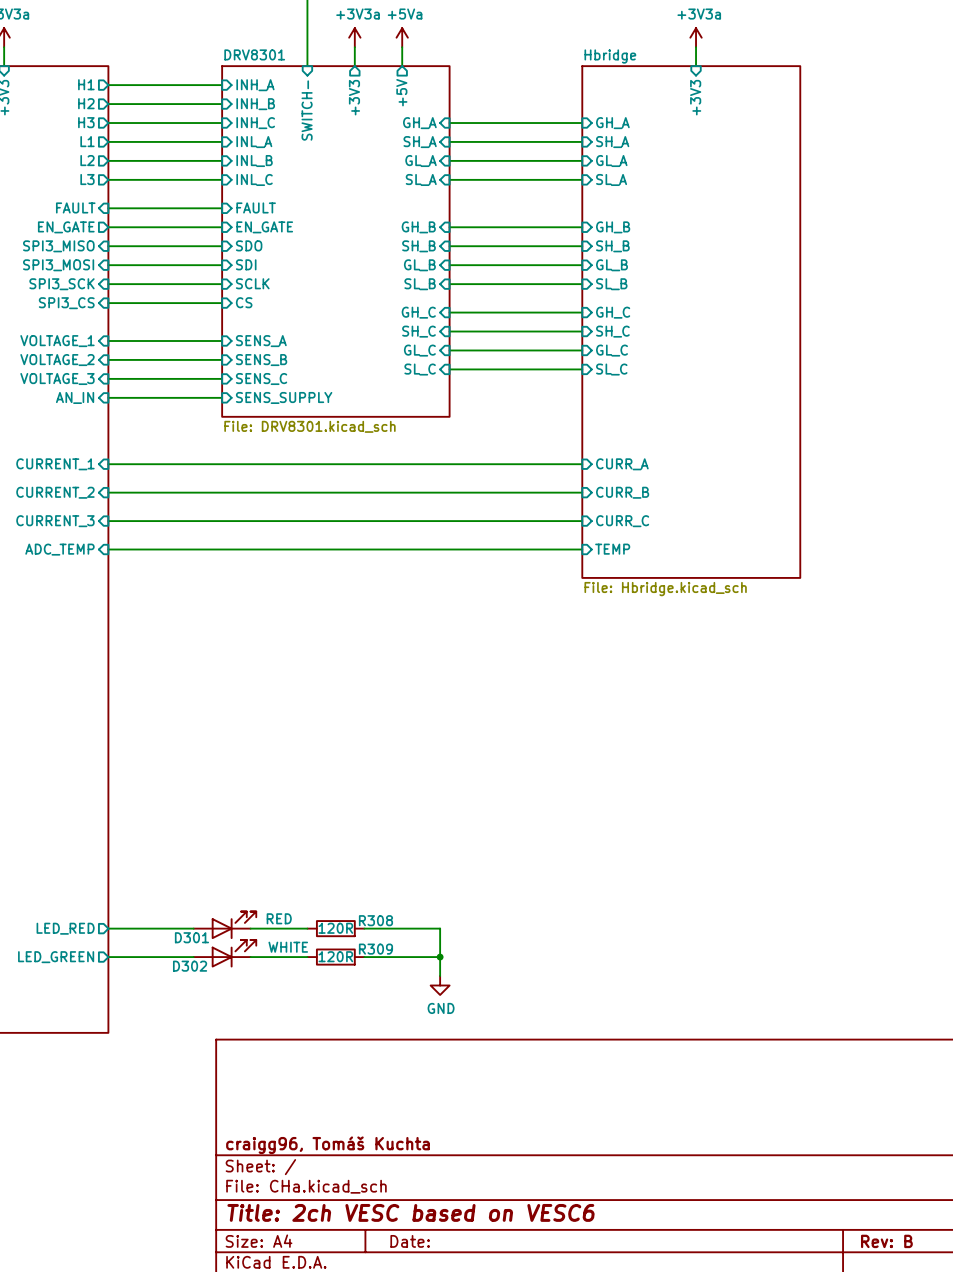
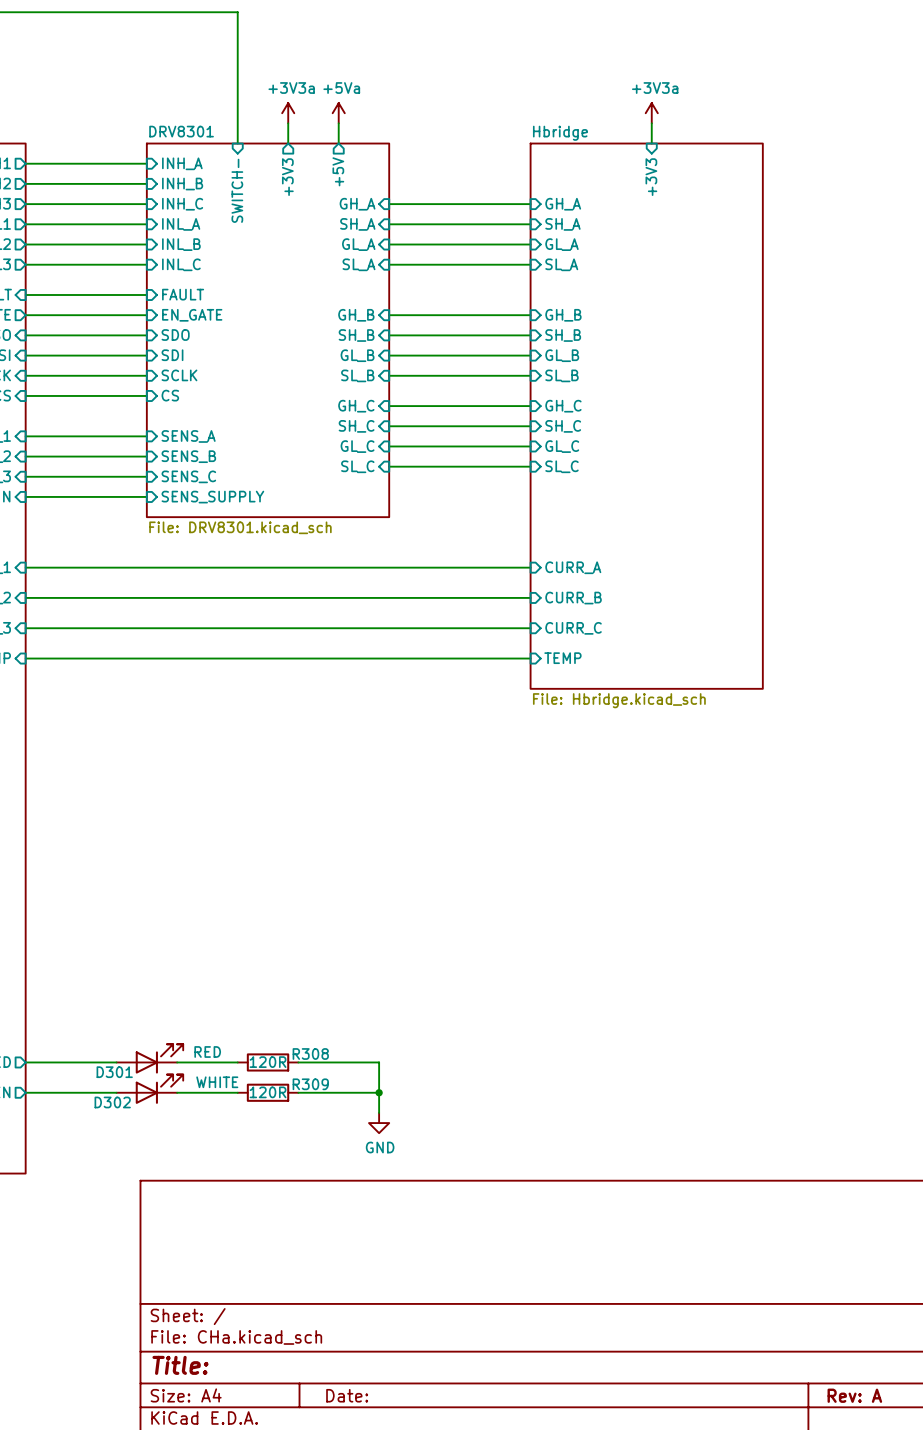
title block: craigg96, Tomáš Kuchta (327, 1145) -> none
title block: Title: 2ch VESC based on VESC6 (411, 1212) -> Title: (180, 1365)
title block: Rev: B (886, 1241) -> Rev: A (854, 1395)

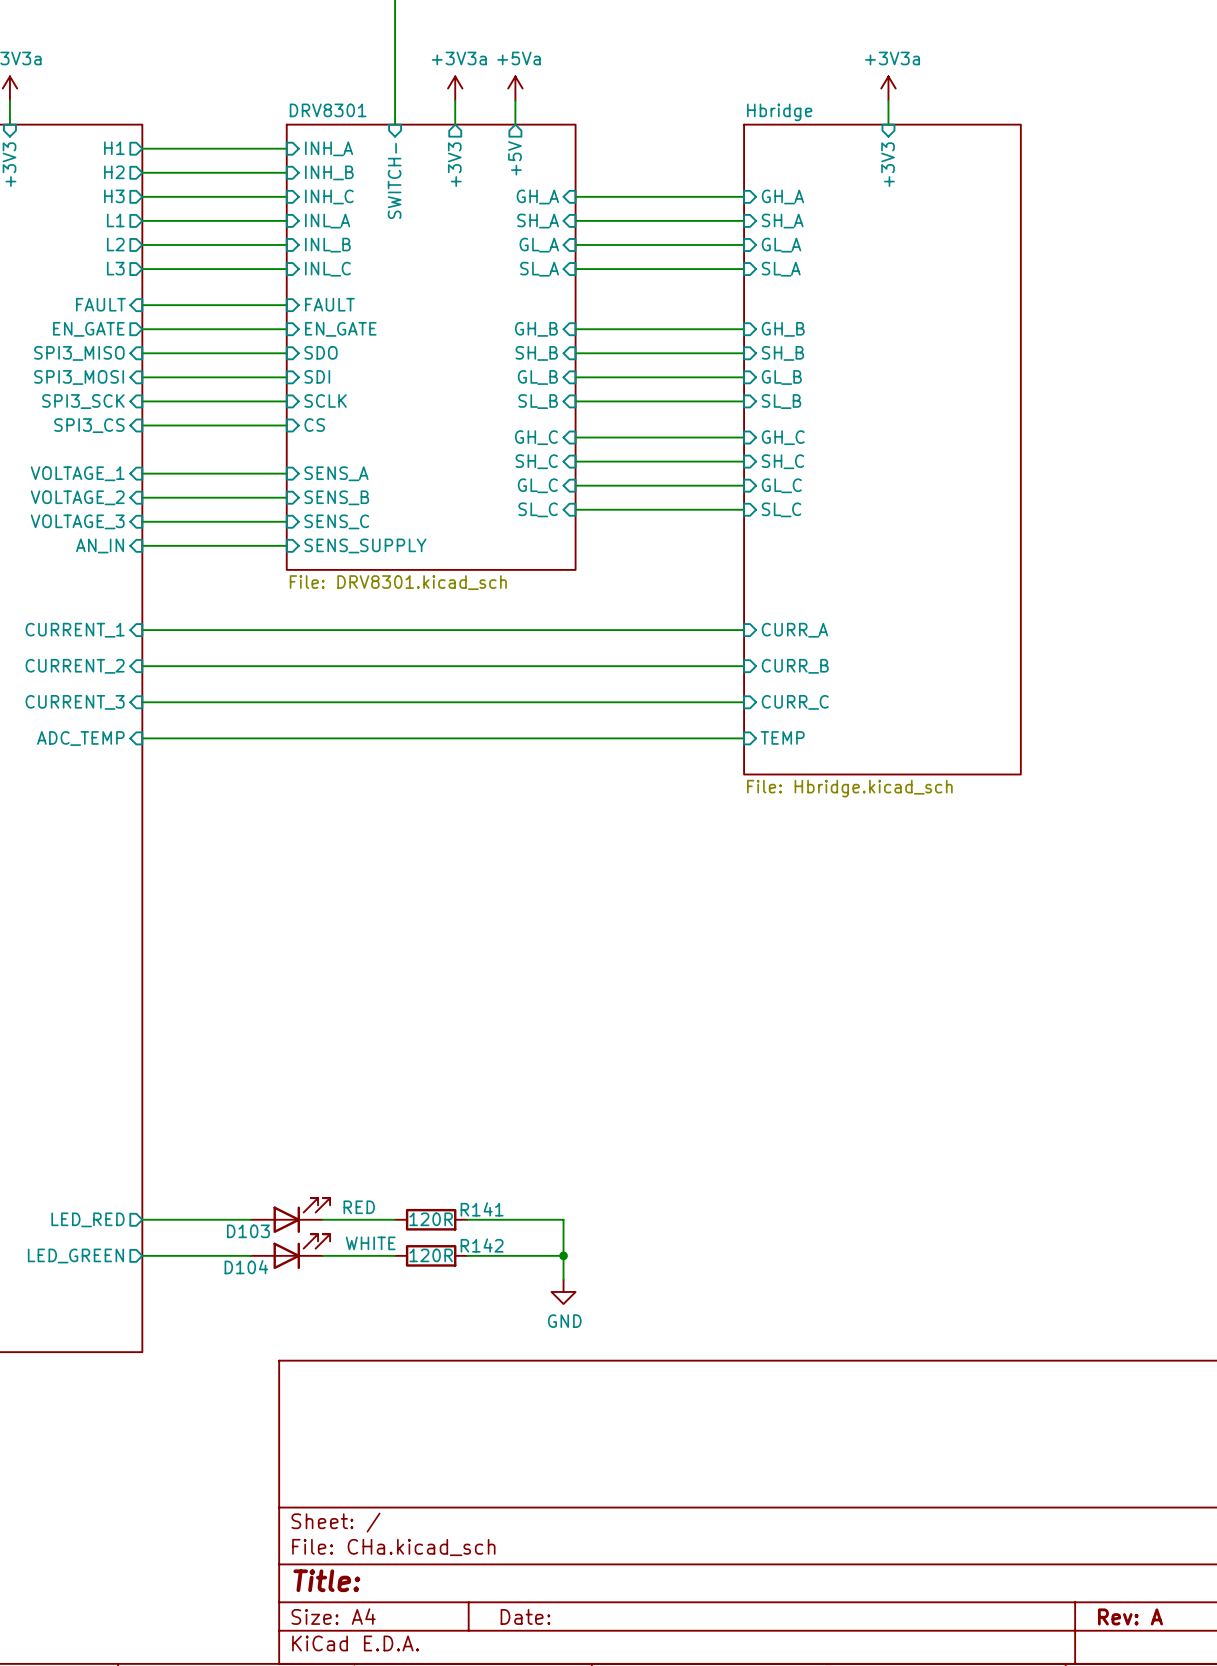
R308 name: R308 (310, 1054) -> R141 (482, 1209)
D301 name: D301 (114, 1072) -> D103 (248, 1231)
R309 name: R309 (310, 1084) -> R142 (482, 1245)
D302 name: D302 (112, 1102) -> D104 (246, 1267)

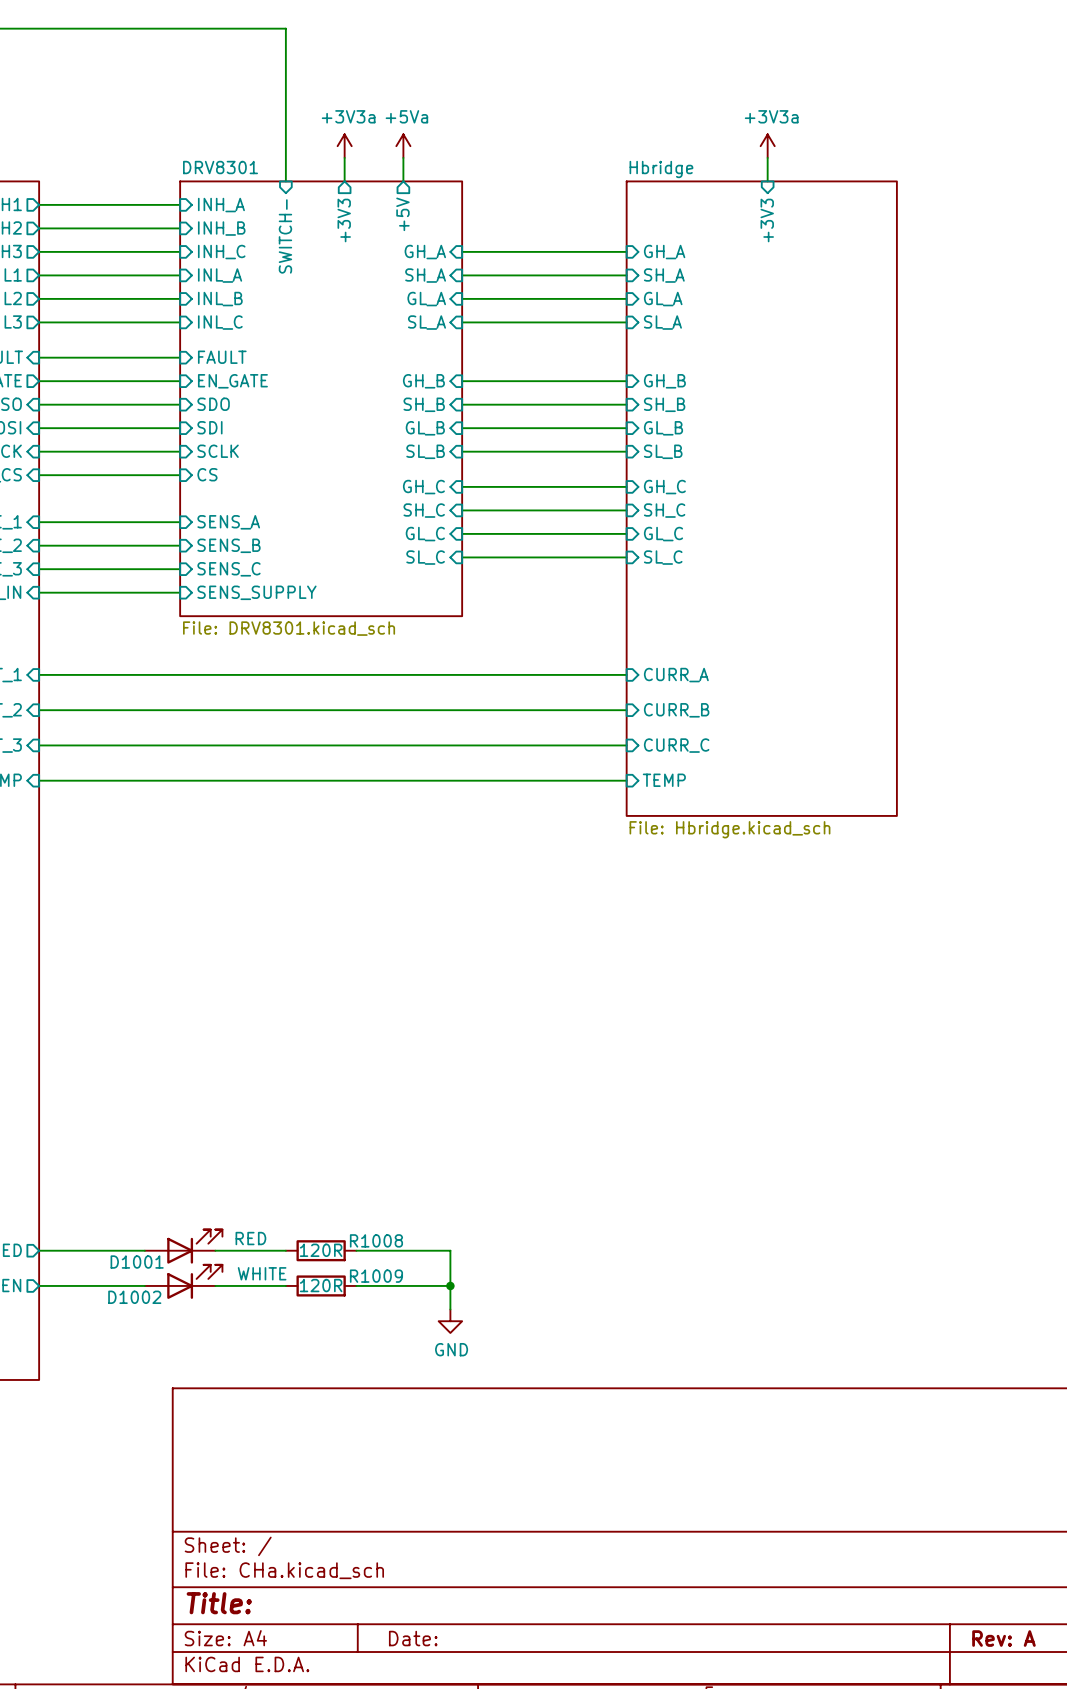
R141 name: R141 (482, 1209) -> R1008 (376, 1240)
D103 name: D103 (248, 1231) -> D1001 (137, 1262)
R142 name: R142 (482, 1245) -> R1009 (376, 1276)
D104 name: D104 (246, 1267) -> D1002 (134, 1297)

